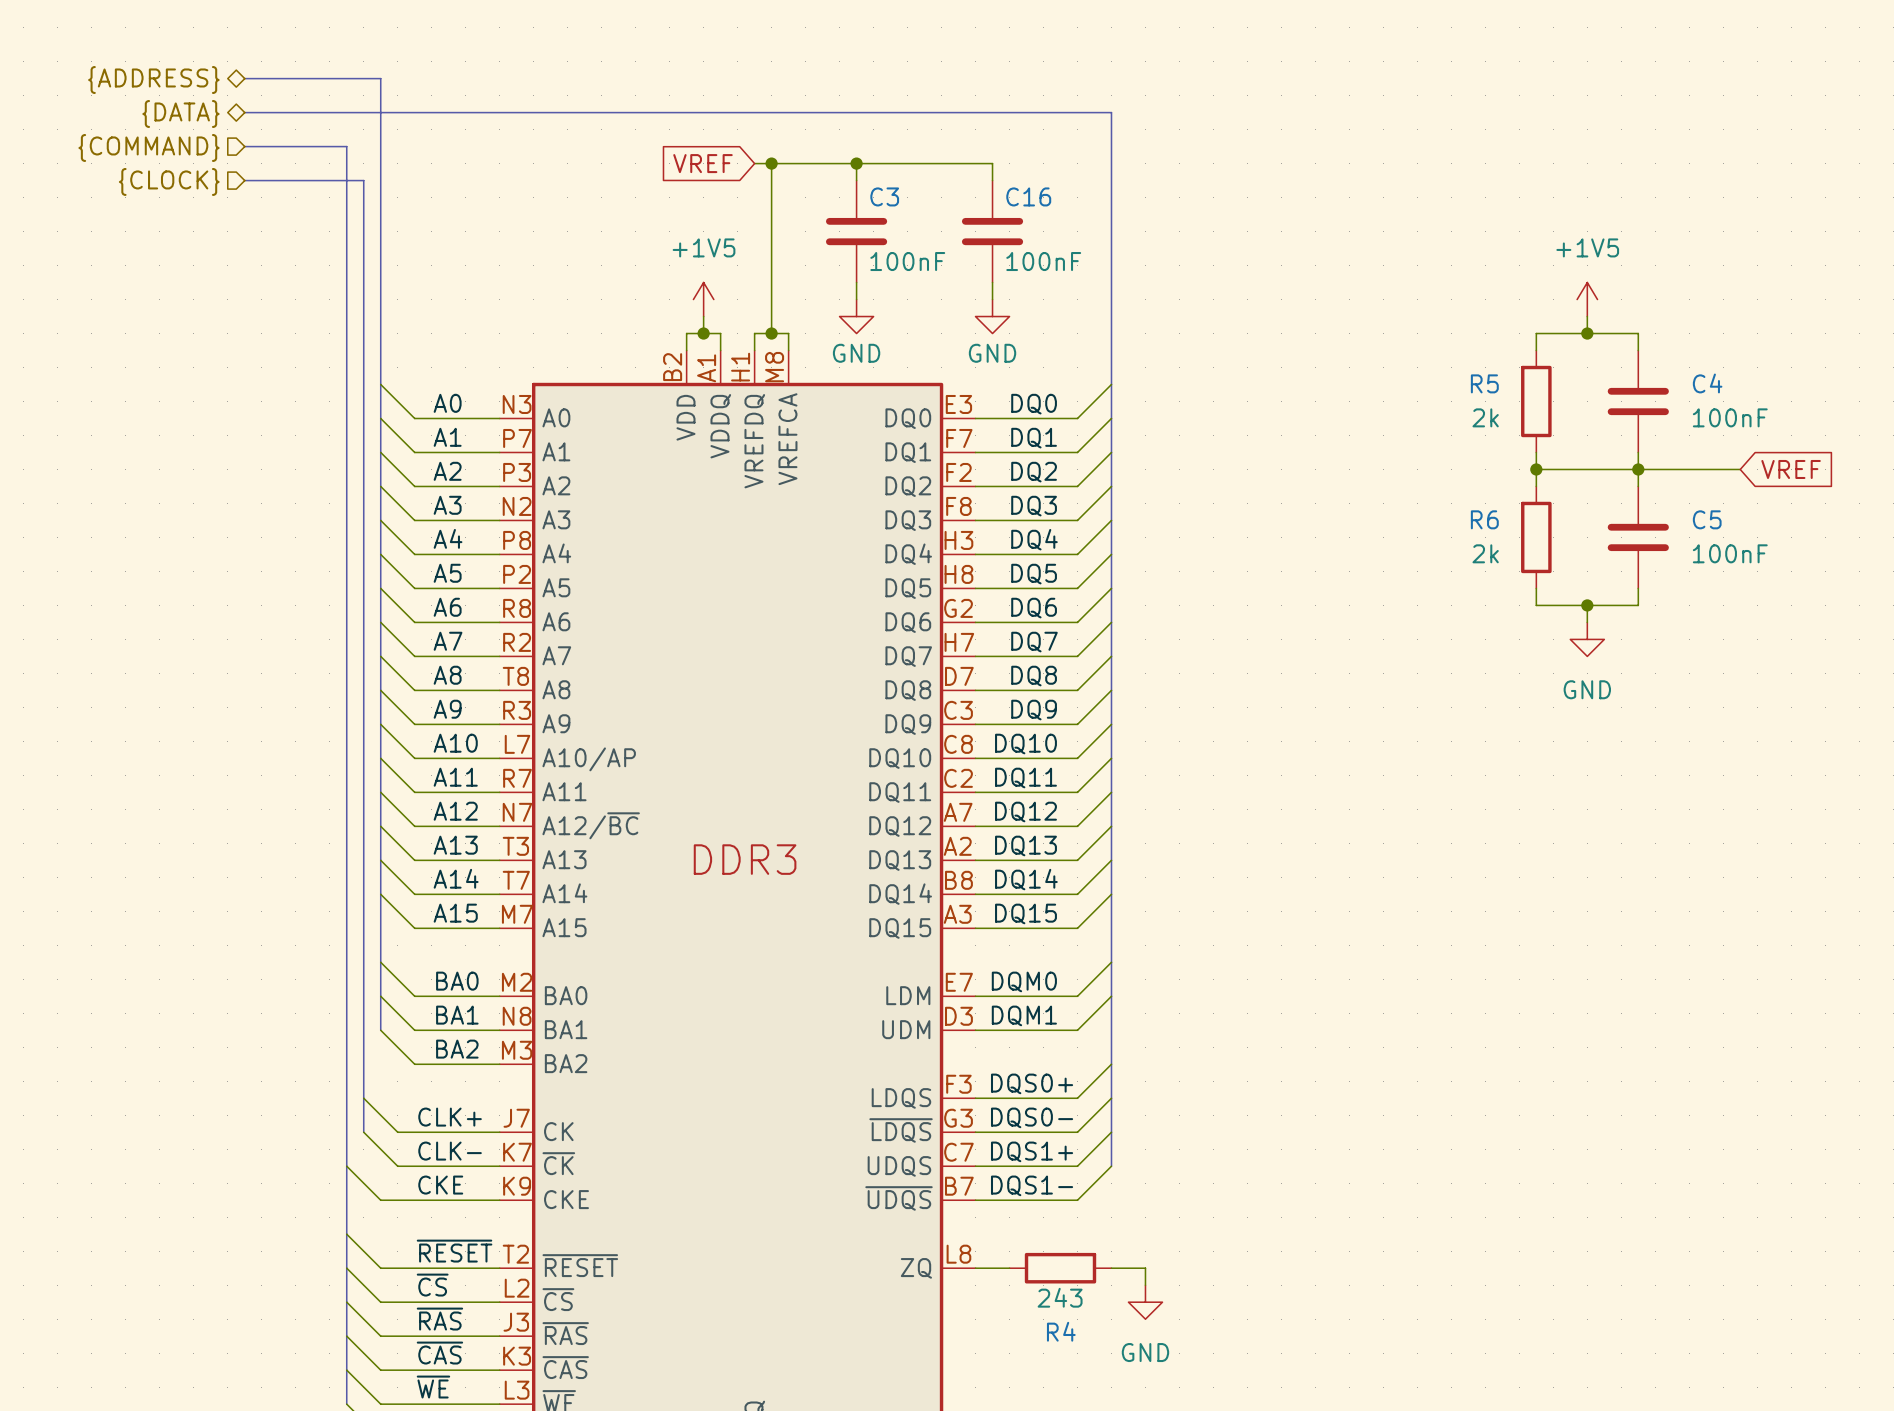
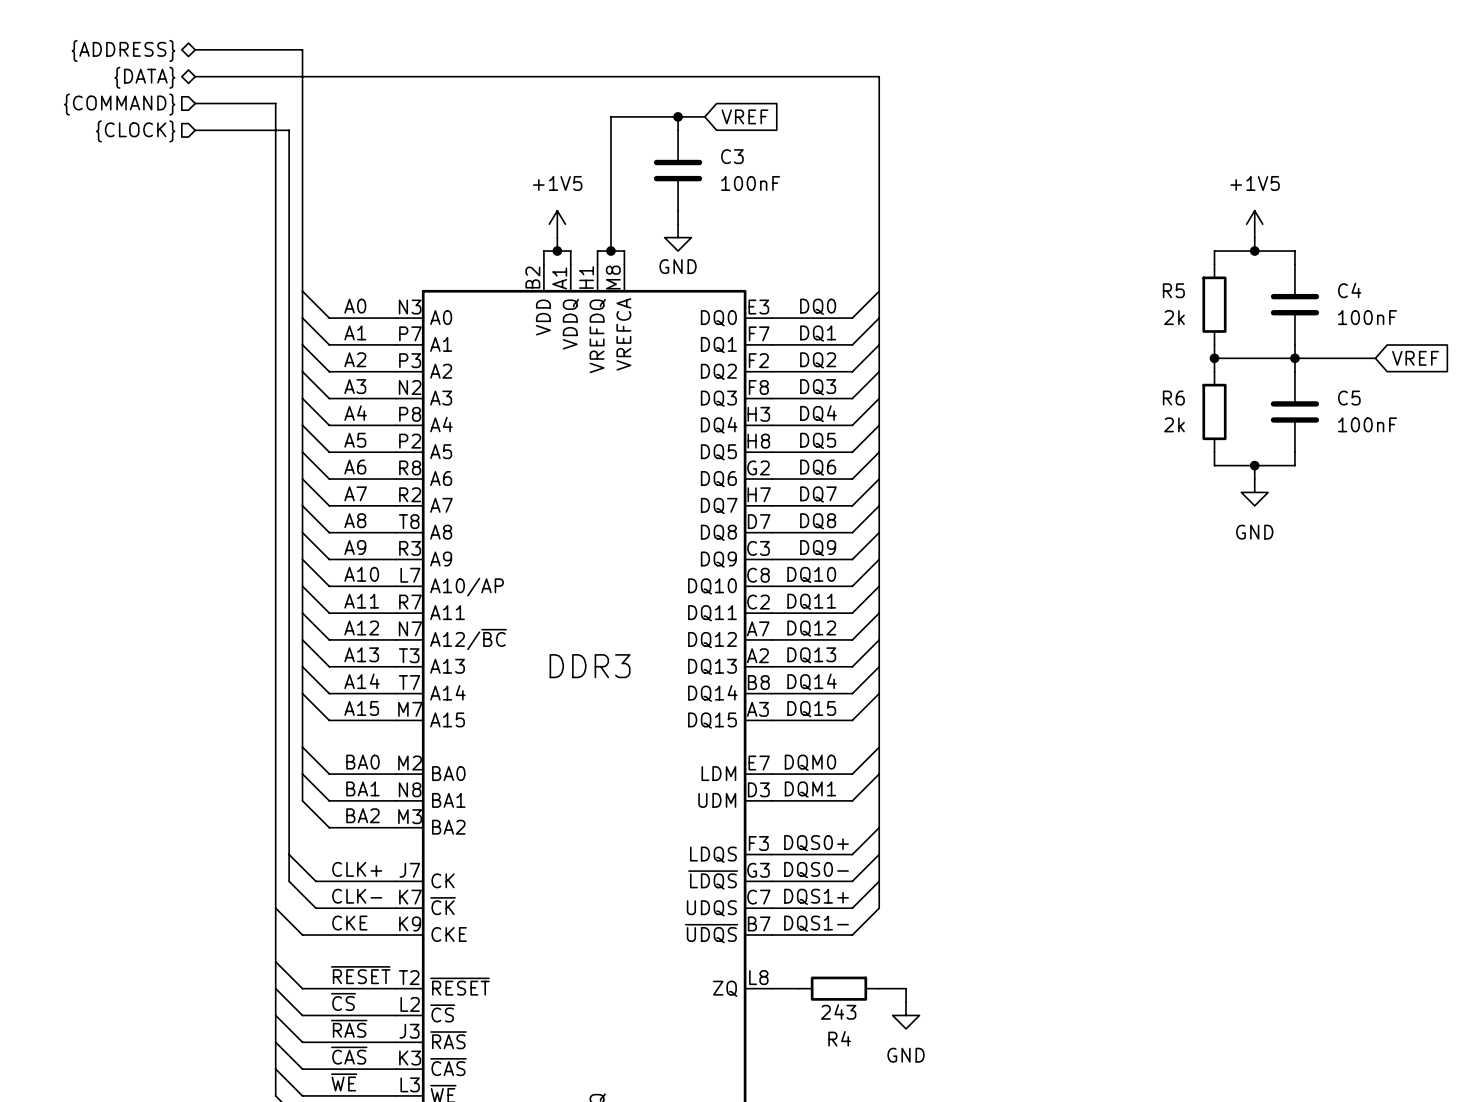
global label rotation: 0° (702, 163) -> 180° (744, 116)
global label position: VREF (702, 163) -> VREF (744, 116)
wire: (754, 163) (771, 163) -> none
junction: (771, 163) -> none
wire: (890, 163) (992, 163) (992, 180) -> none
C3 name position: C3 (884, 196) -> C3 (732, 156)
C16: 100nF (992, 231) -> none
C3 value position: 100nF (907, 261) -> 100nF (750, 183)
wire: (992, 282) (992, 299) -> none
power symbol: GND (992, 316) -> none

